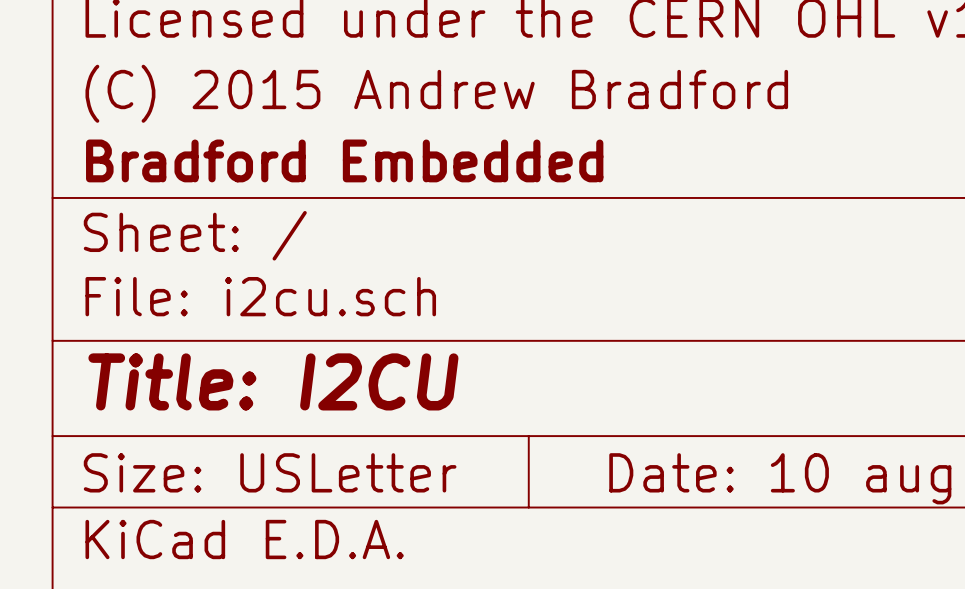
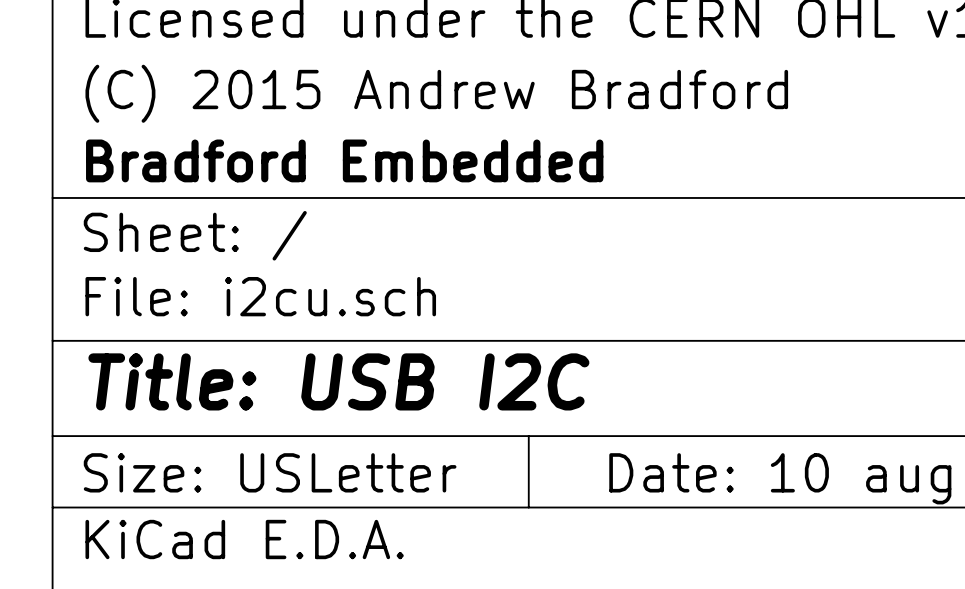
title block: Title: I2CU (273, 381) -> Title: USB I2C (338, 381)

